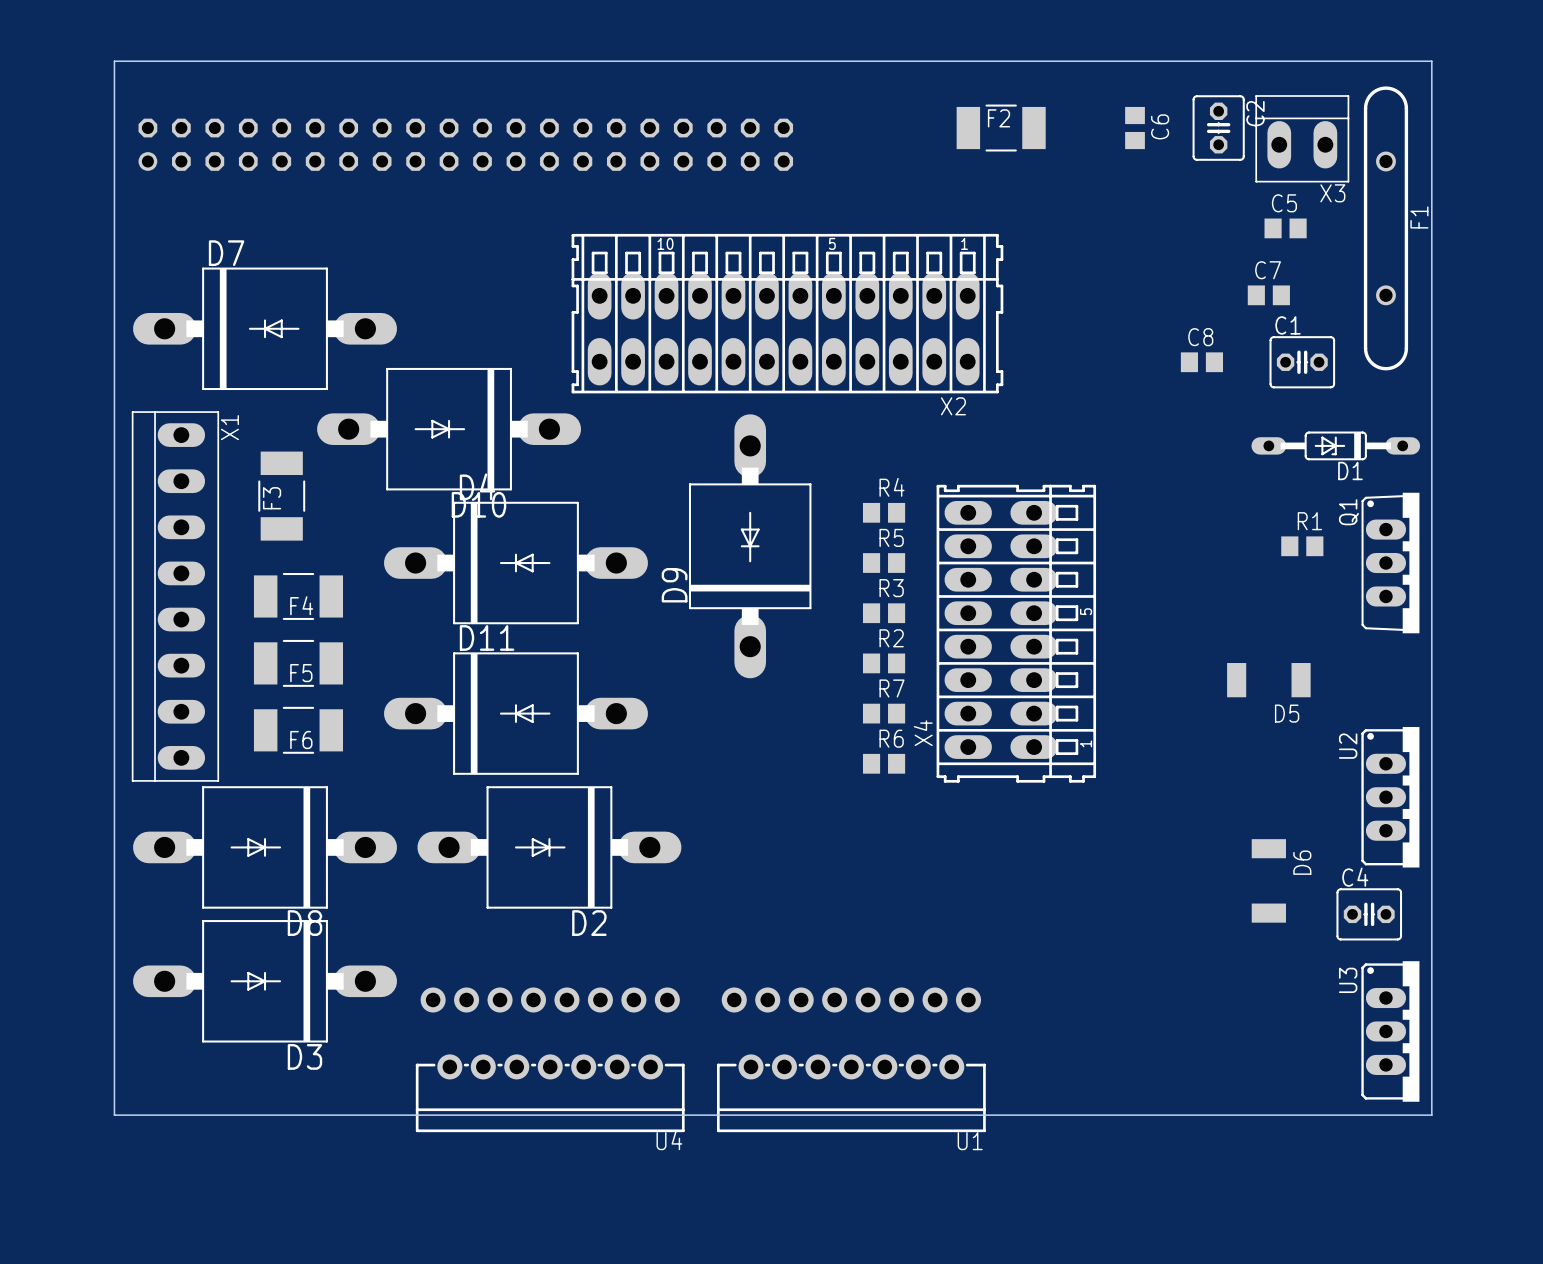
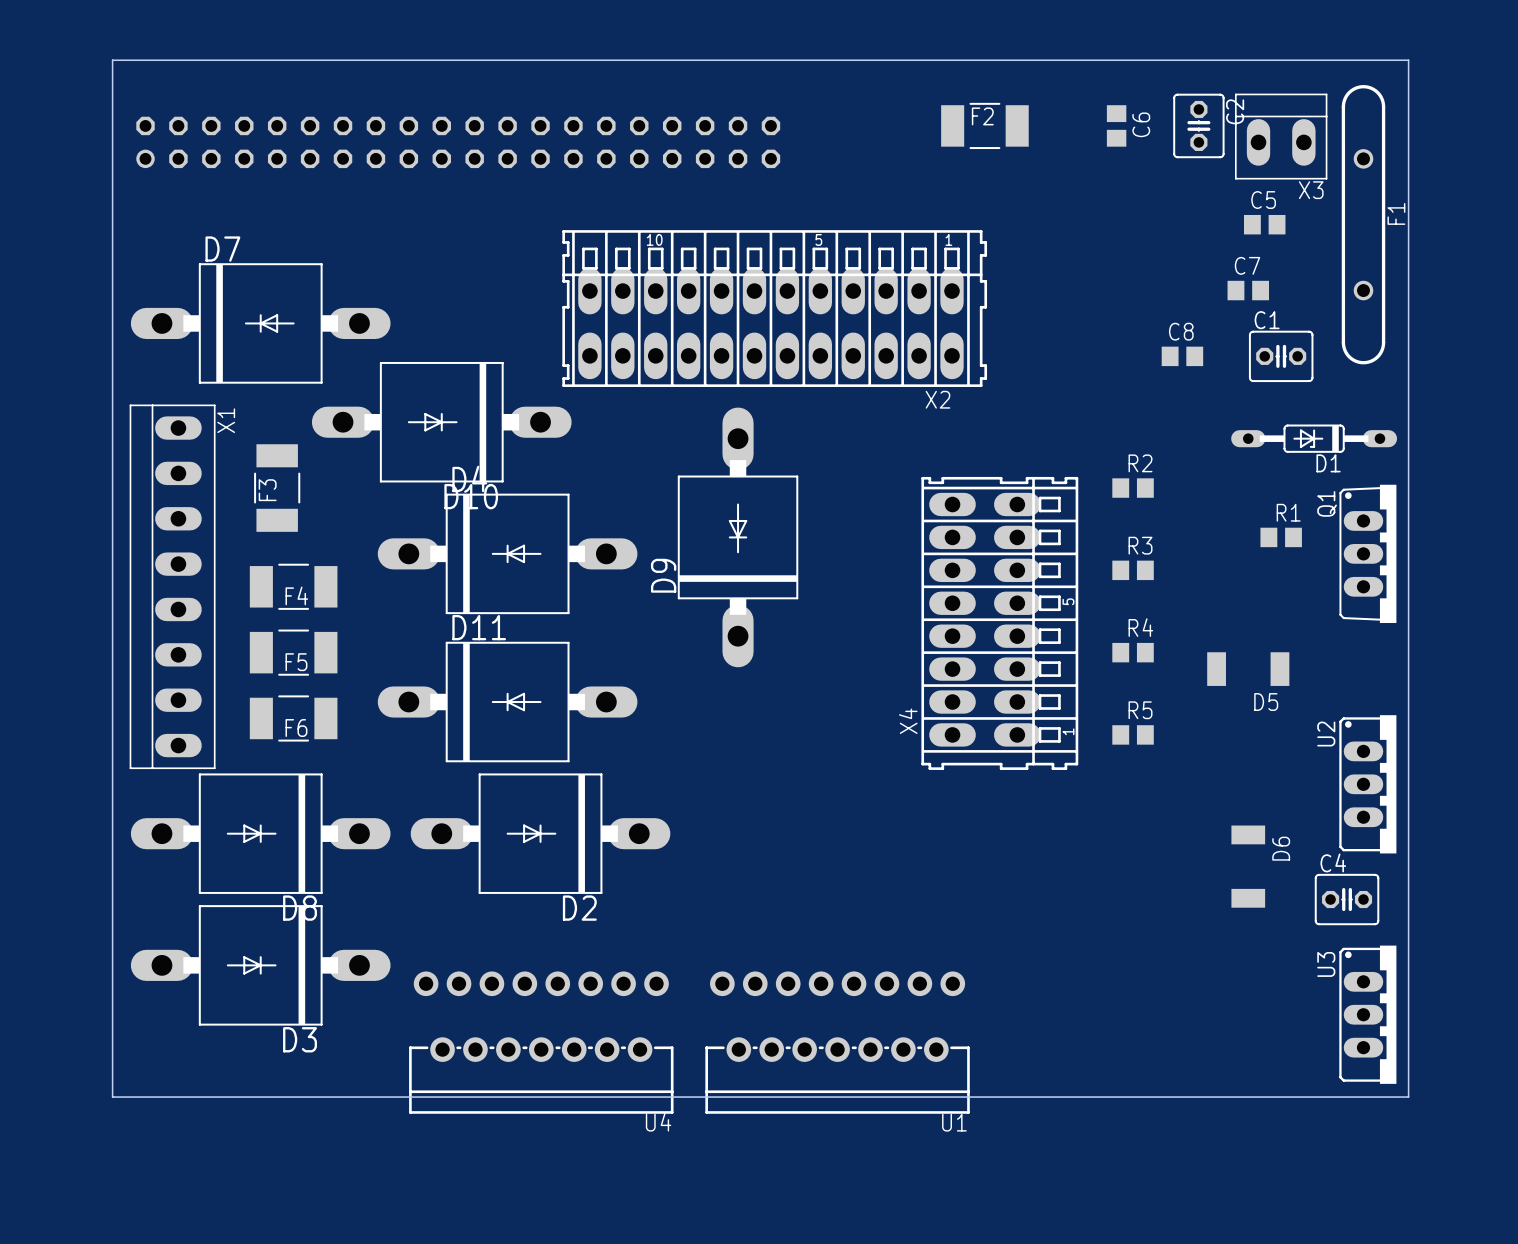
R4 position: (884, 512) -> (1133, 652)
R5 position: (884, 563) -> (1133, 734)
R3 position: (884, 613) -> (1133, 570)
R2 position: (884, 663) -> (1133, 488)
R7: (884, 713) -> none
R6: (884, 763) -> none

